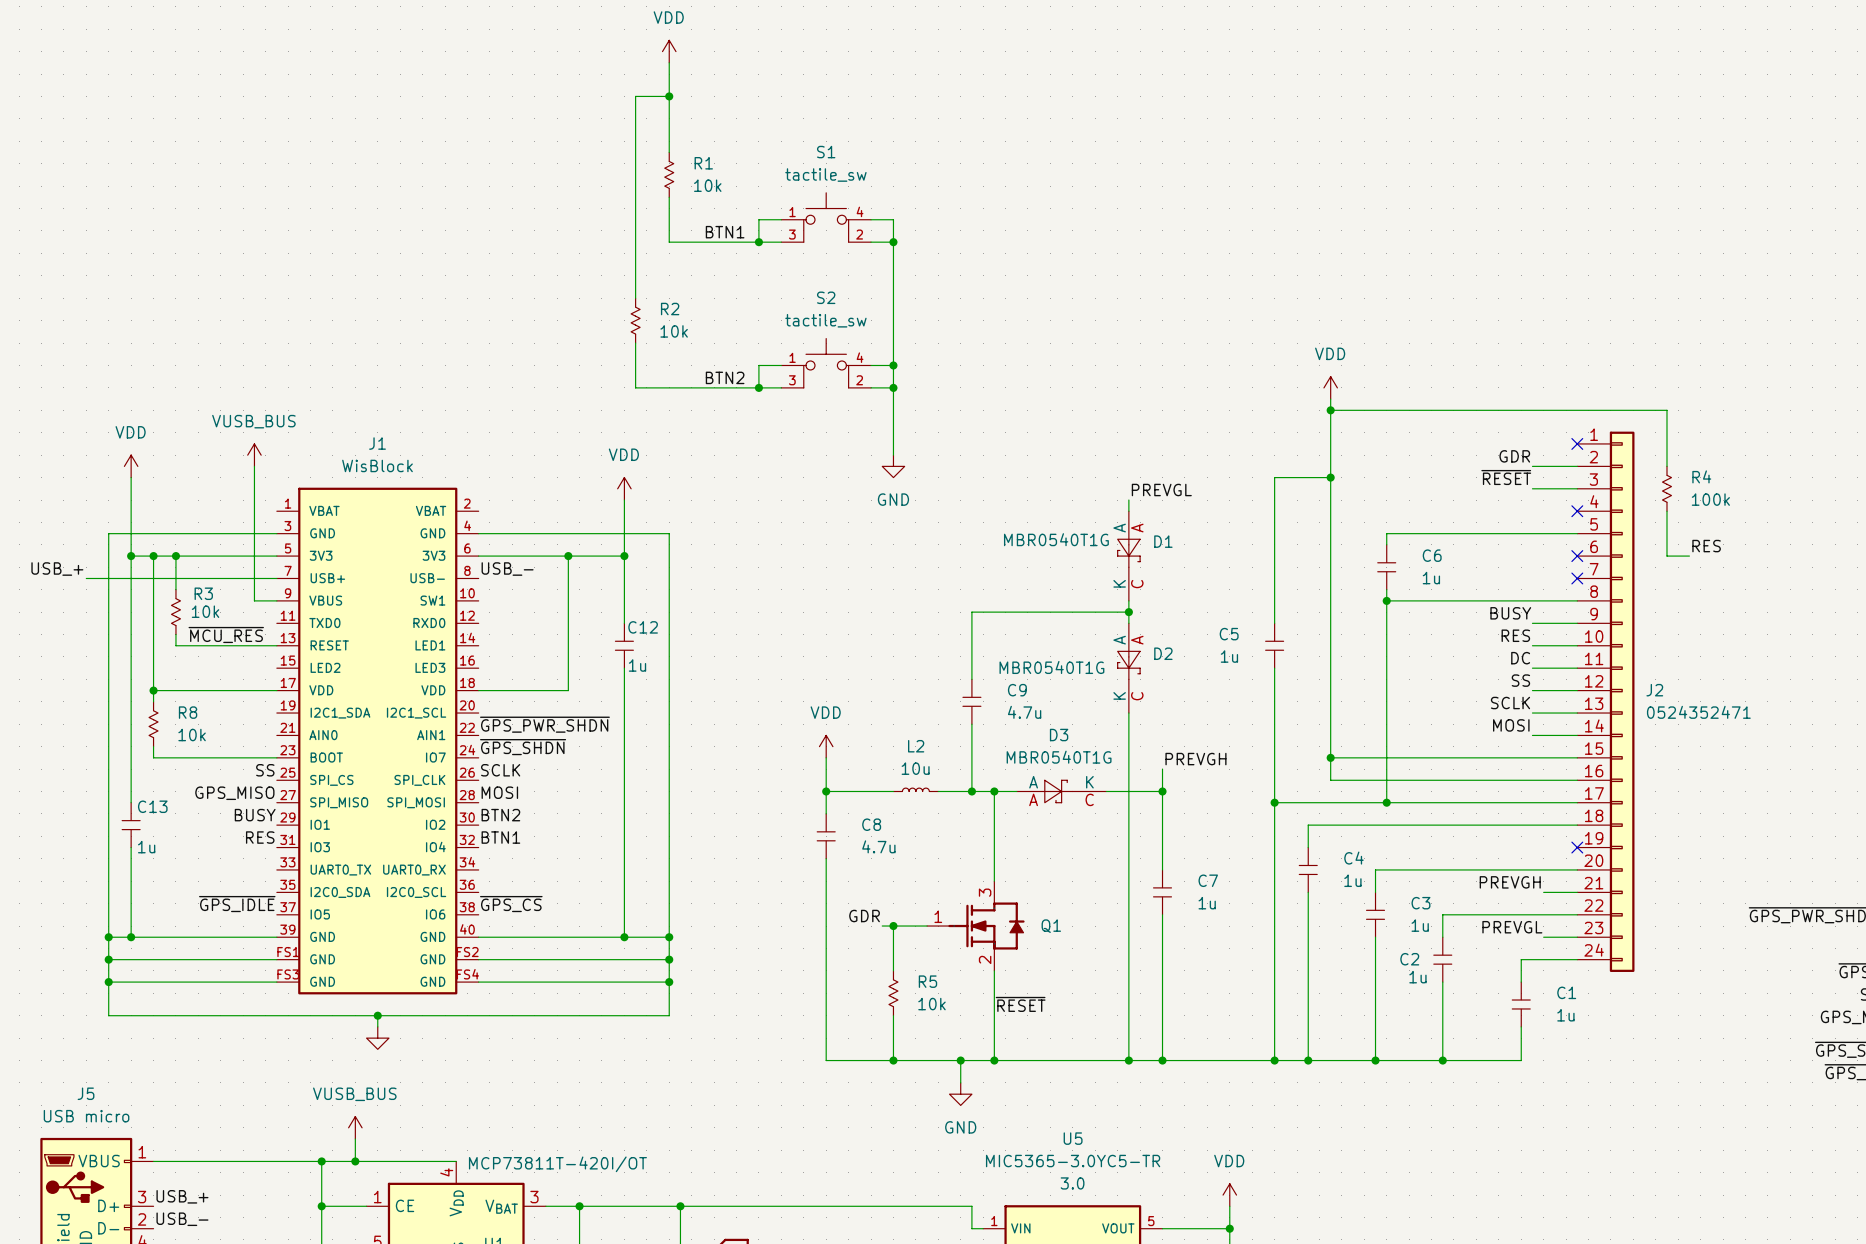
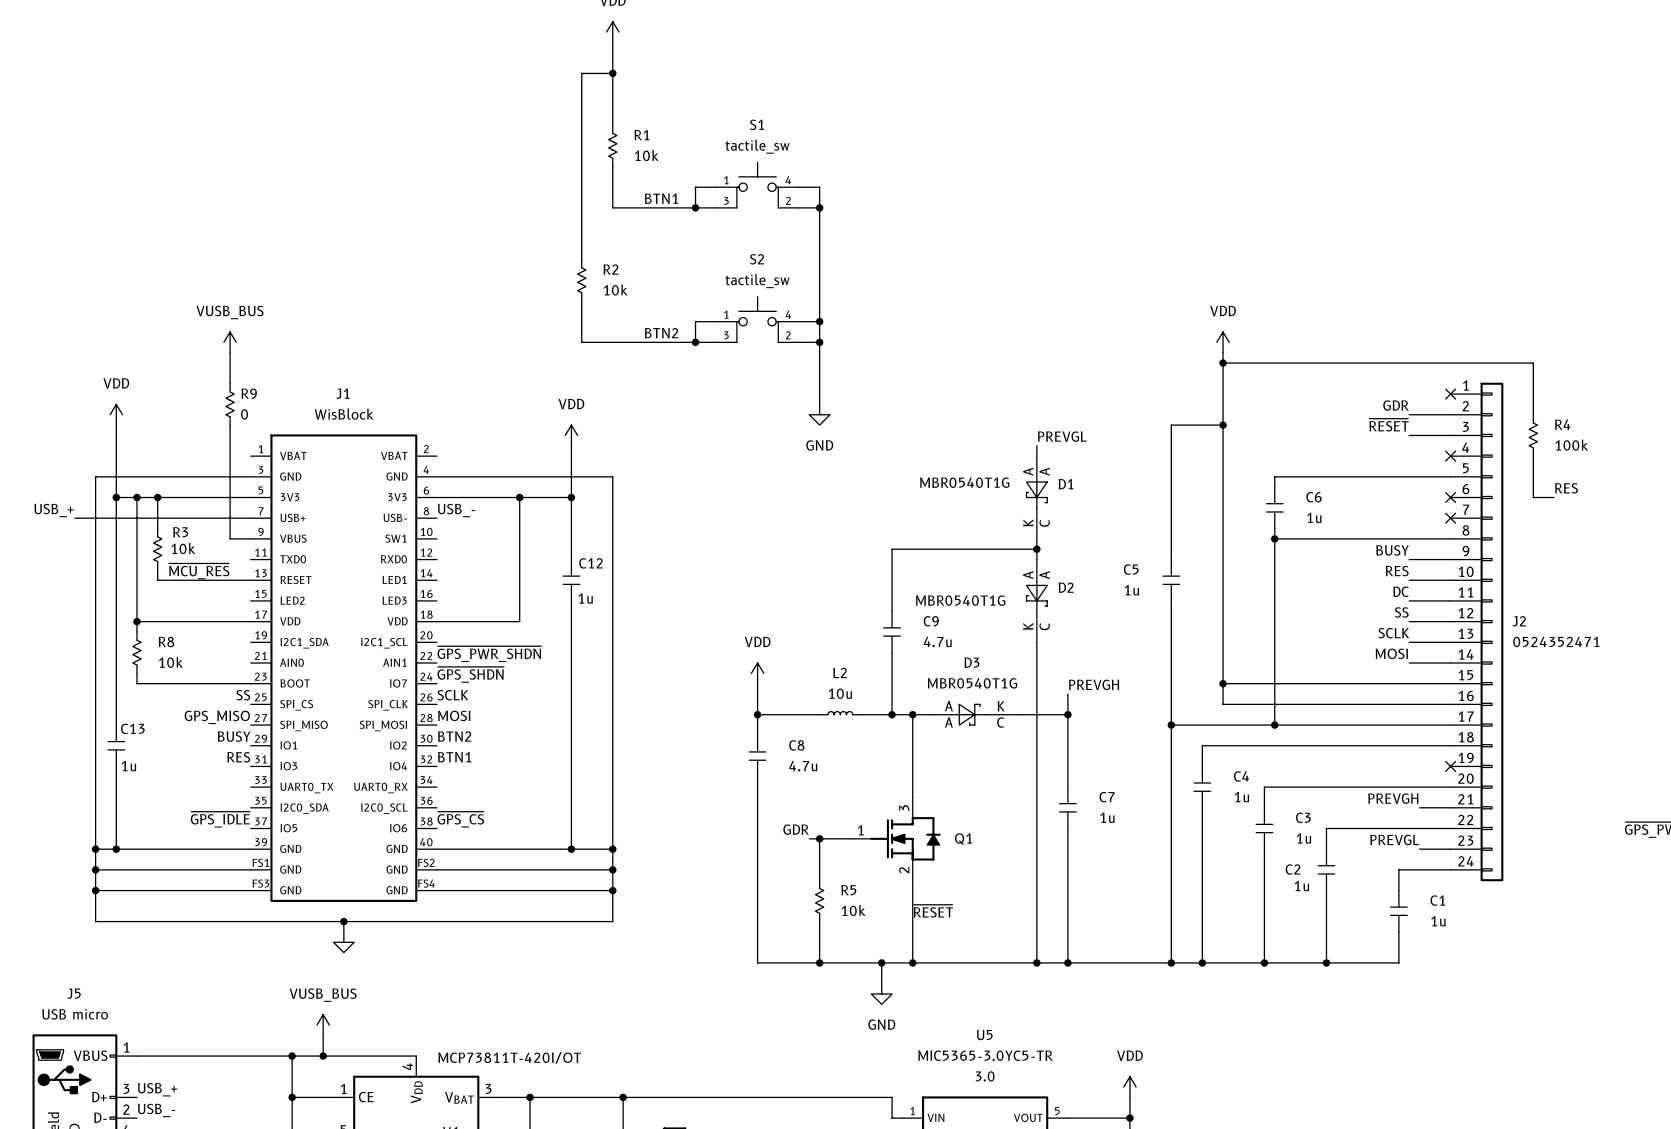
wire: none -> (230, 352) (230, 383)
power symbol position: VUSB_BUS (254, 455) -> VUSB_BUS (230, 342)
R9: none -> 0 (230, 404)

